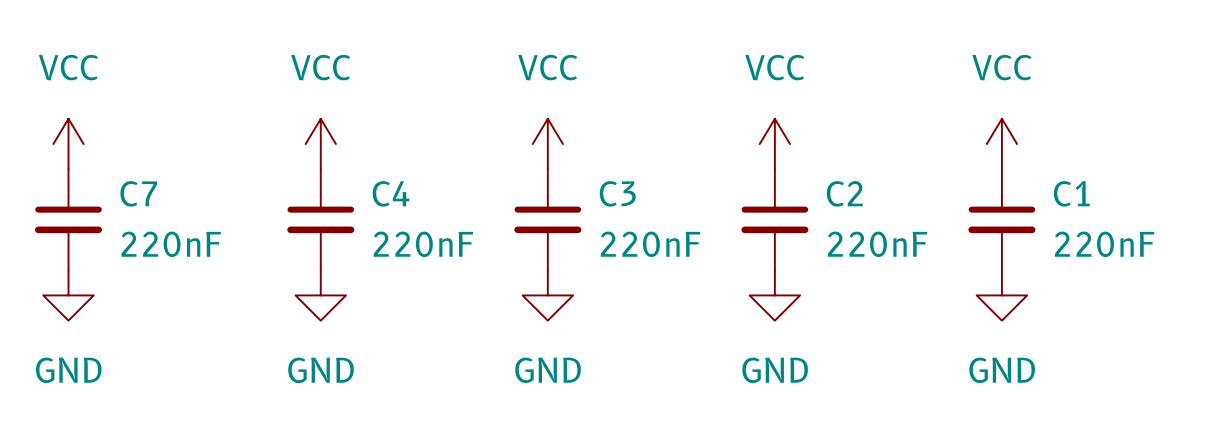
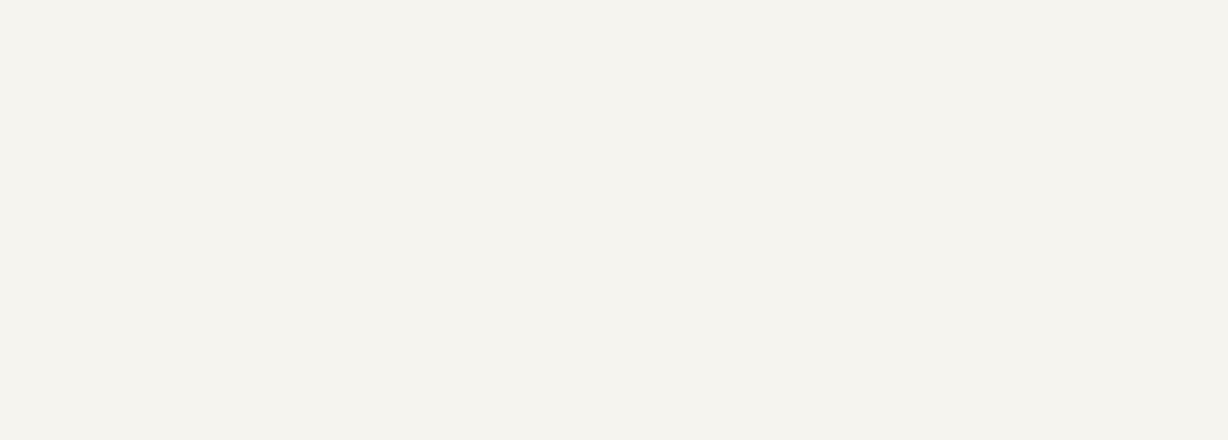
power symbol: VCC (68, 144) -> none
power symbol: VCC (320, 144) -> none
power symbol: VCC (547, 144) -> none
power symbol: VCC (774, 144) -> none
power symbol: VCC (1001, 144) -> none
C7: 220nF (68, 219) -> none
C4: 220nF (320, 219) -> none
C3: 220nF (547, 219) -> none
C2: 220nF (774, 219) -> none
C1: 220nF (1001, 219) -> none
power symbol: GND (68, 295) -> none
power symbol: GND (320, 295) -> none
power symbol: GND (547, 295) -> none
power symbol: GND (774, 295) -> none
power symbol: GND (1001, 295) -> none

